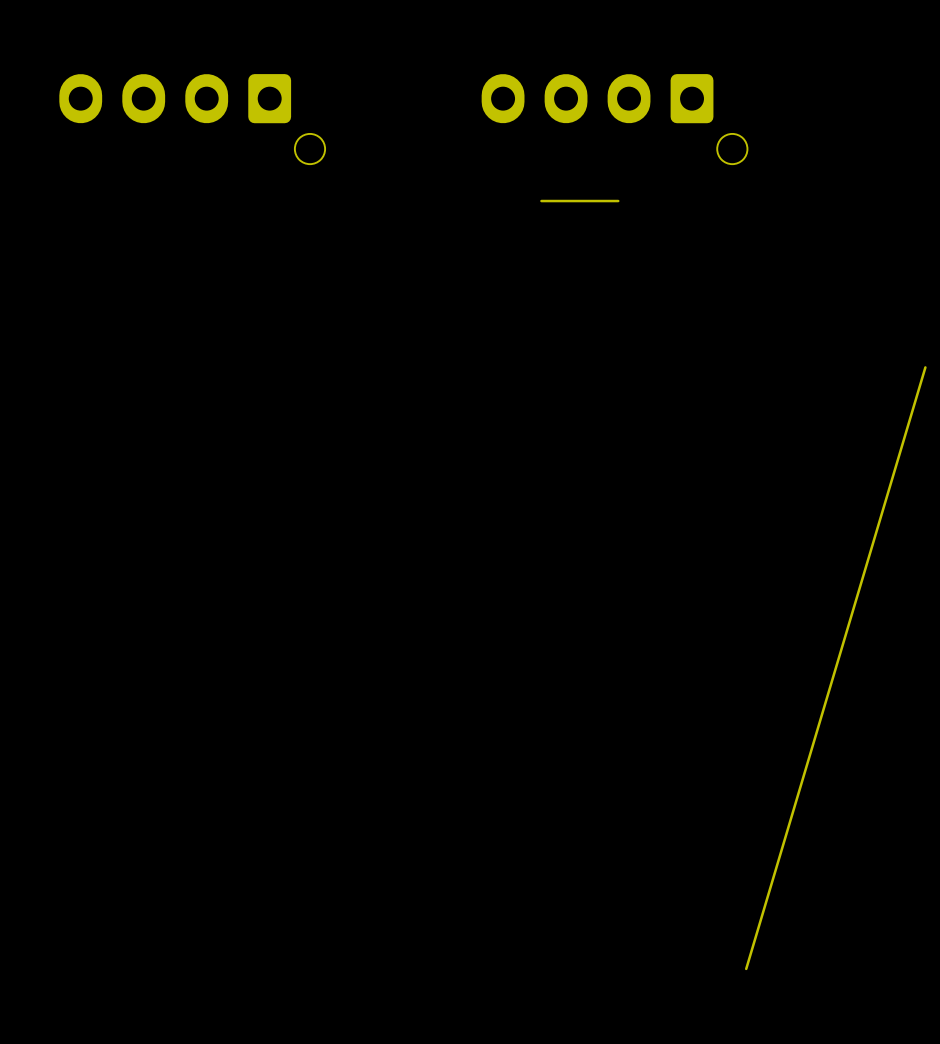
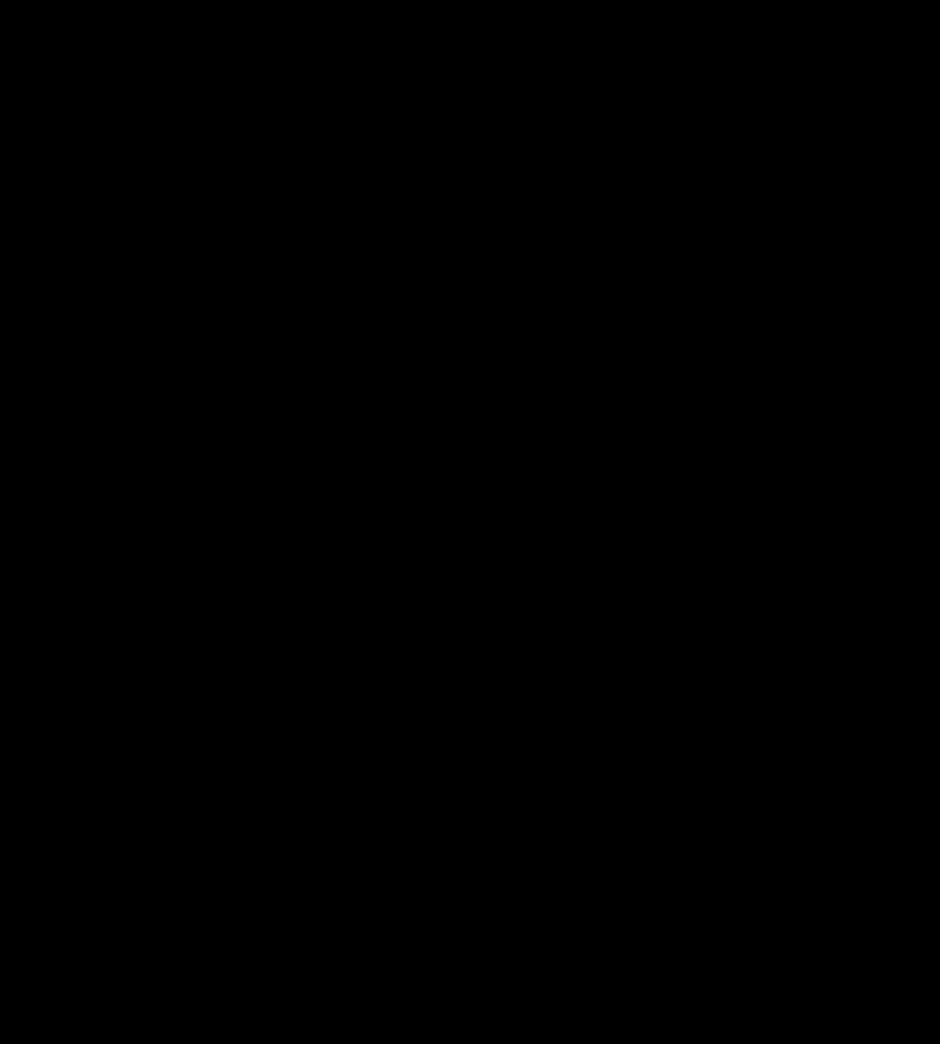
part: (192, 119) -> none
part: (614, 119) -> none
board edge: (618, 201) (541, 201) -> none
board edge: (925, 367) (746, 968) -> none

